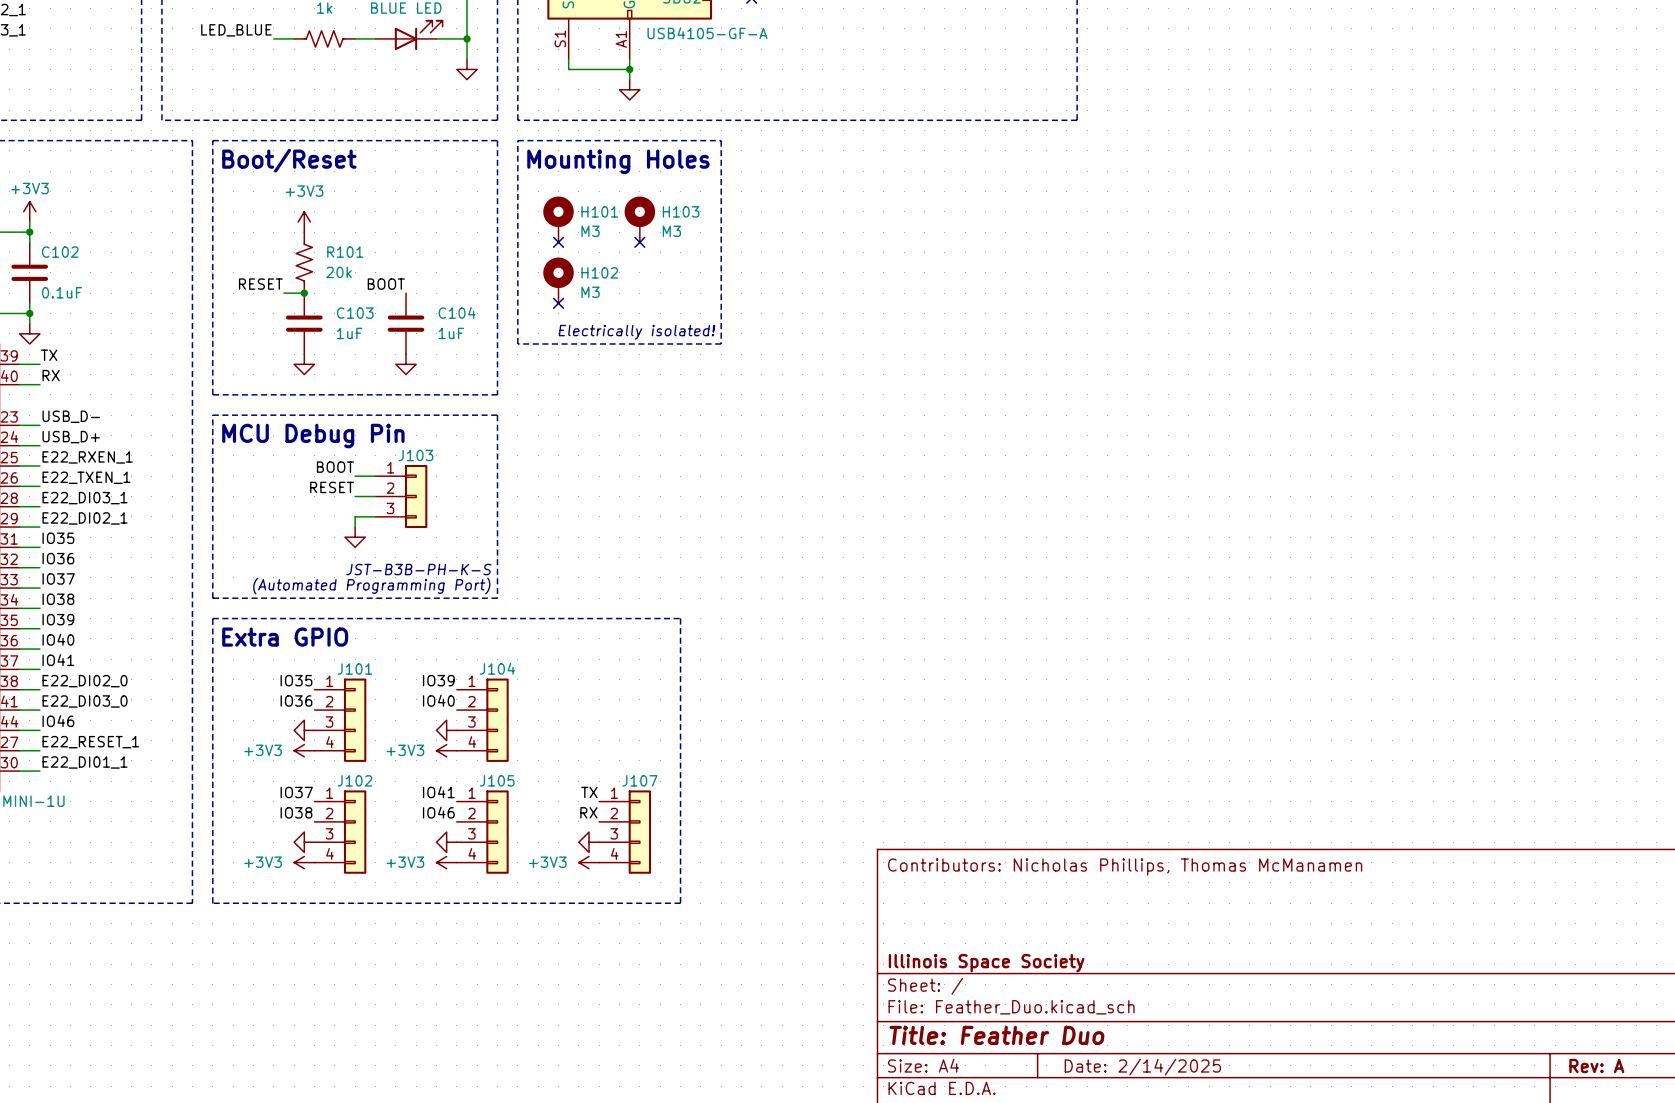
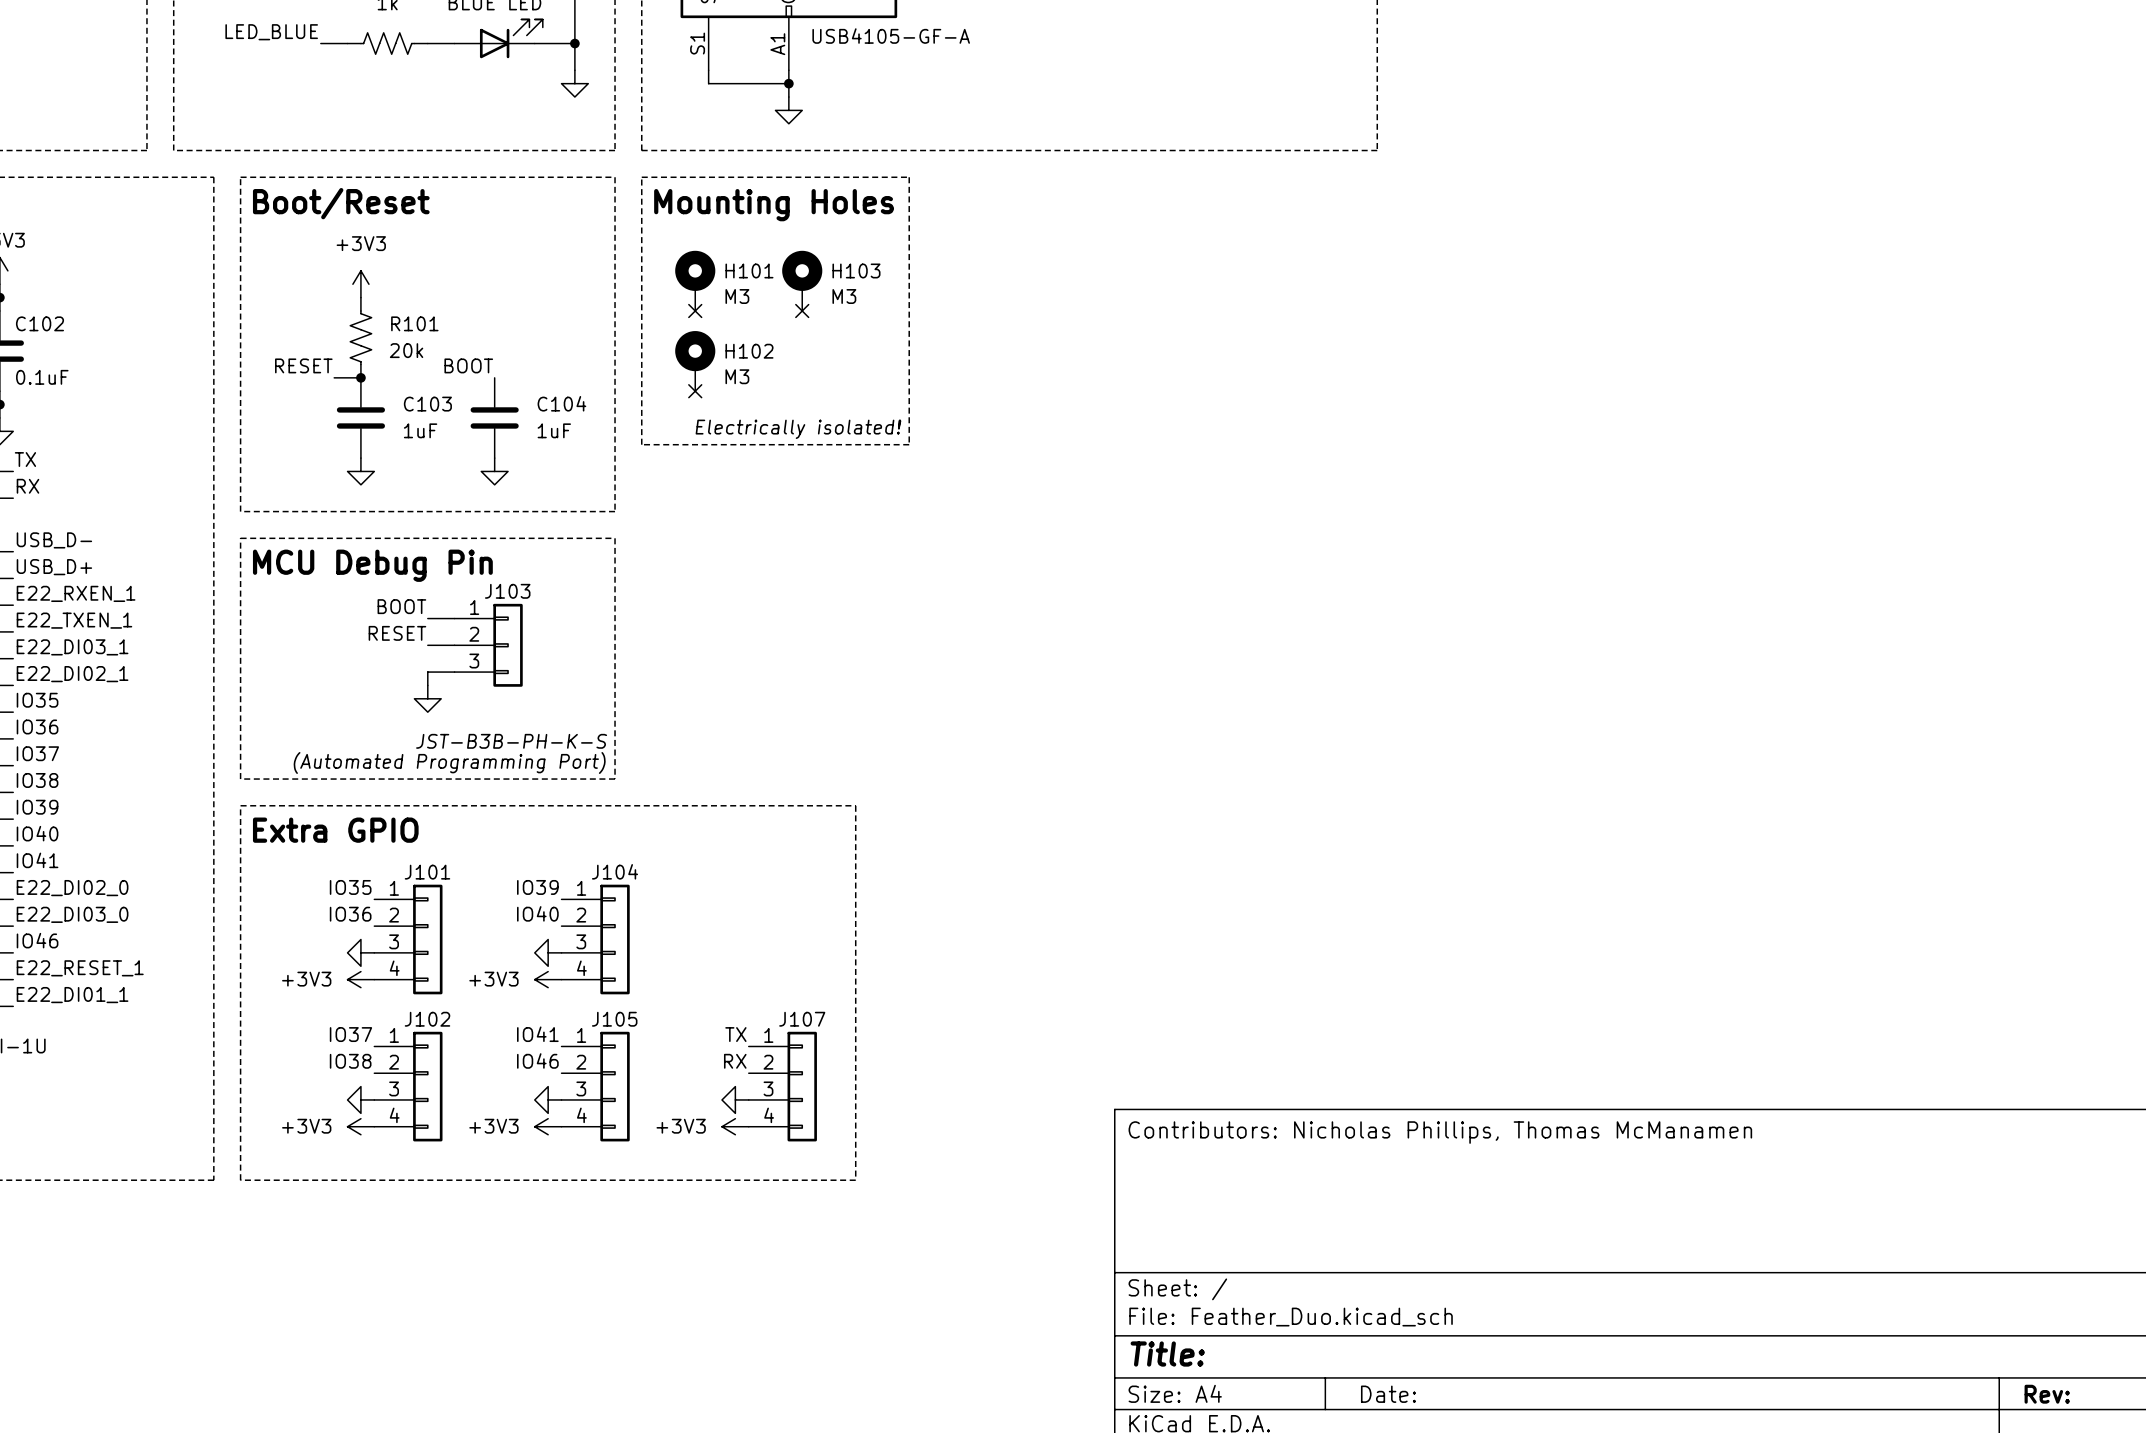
title block: Illinois Space Society (986, 963) -> none
title block: Title: Feather Duo (996, 1035) -> Title: (1167, 1354)
title block: Rev: A (1596, 1065) -> Rev: (2047, 1394)
title block: Date: 2/14/2025 (1142, 1067) -> Date: (1388, 1394)

